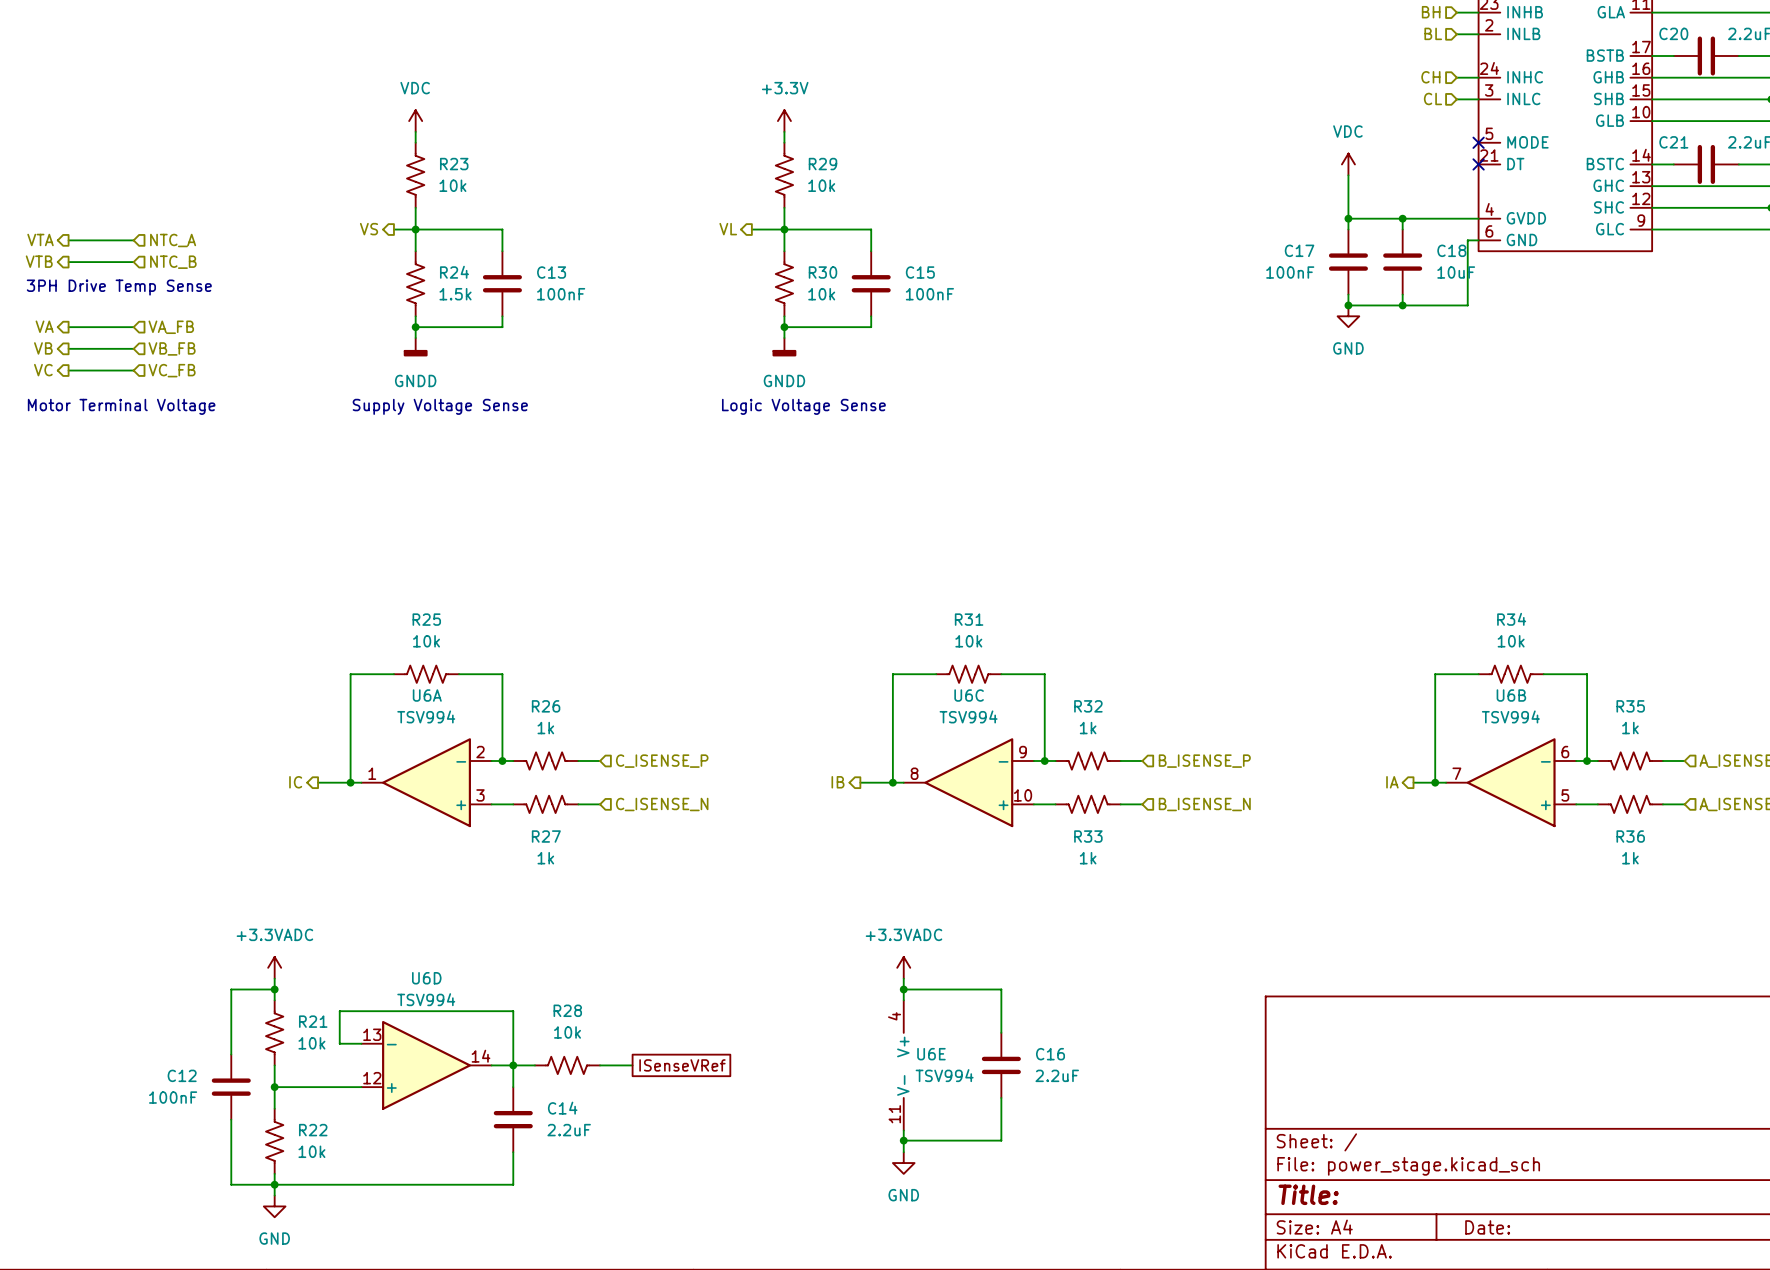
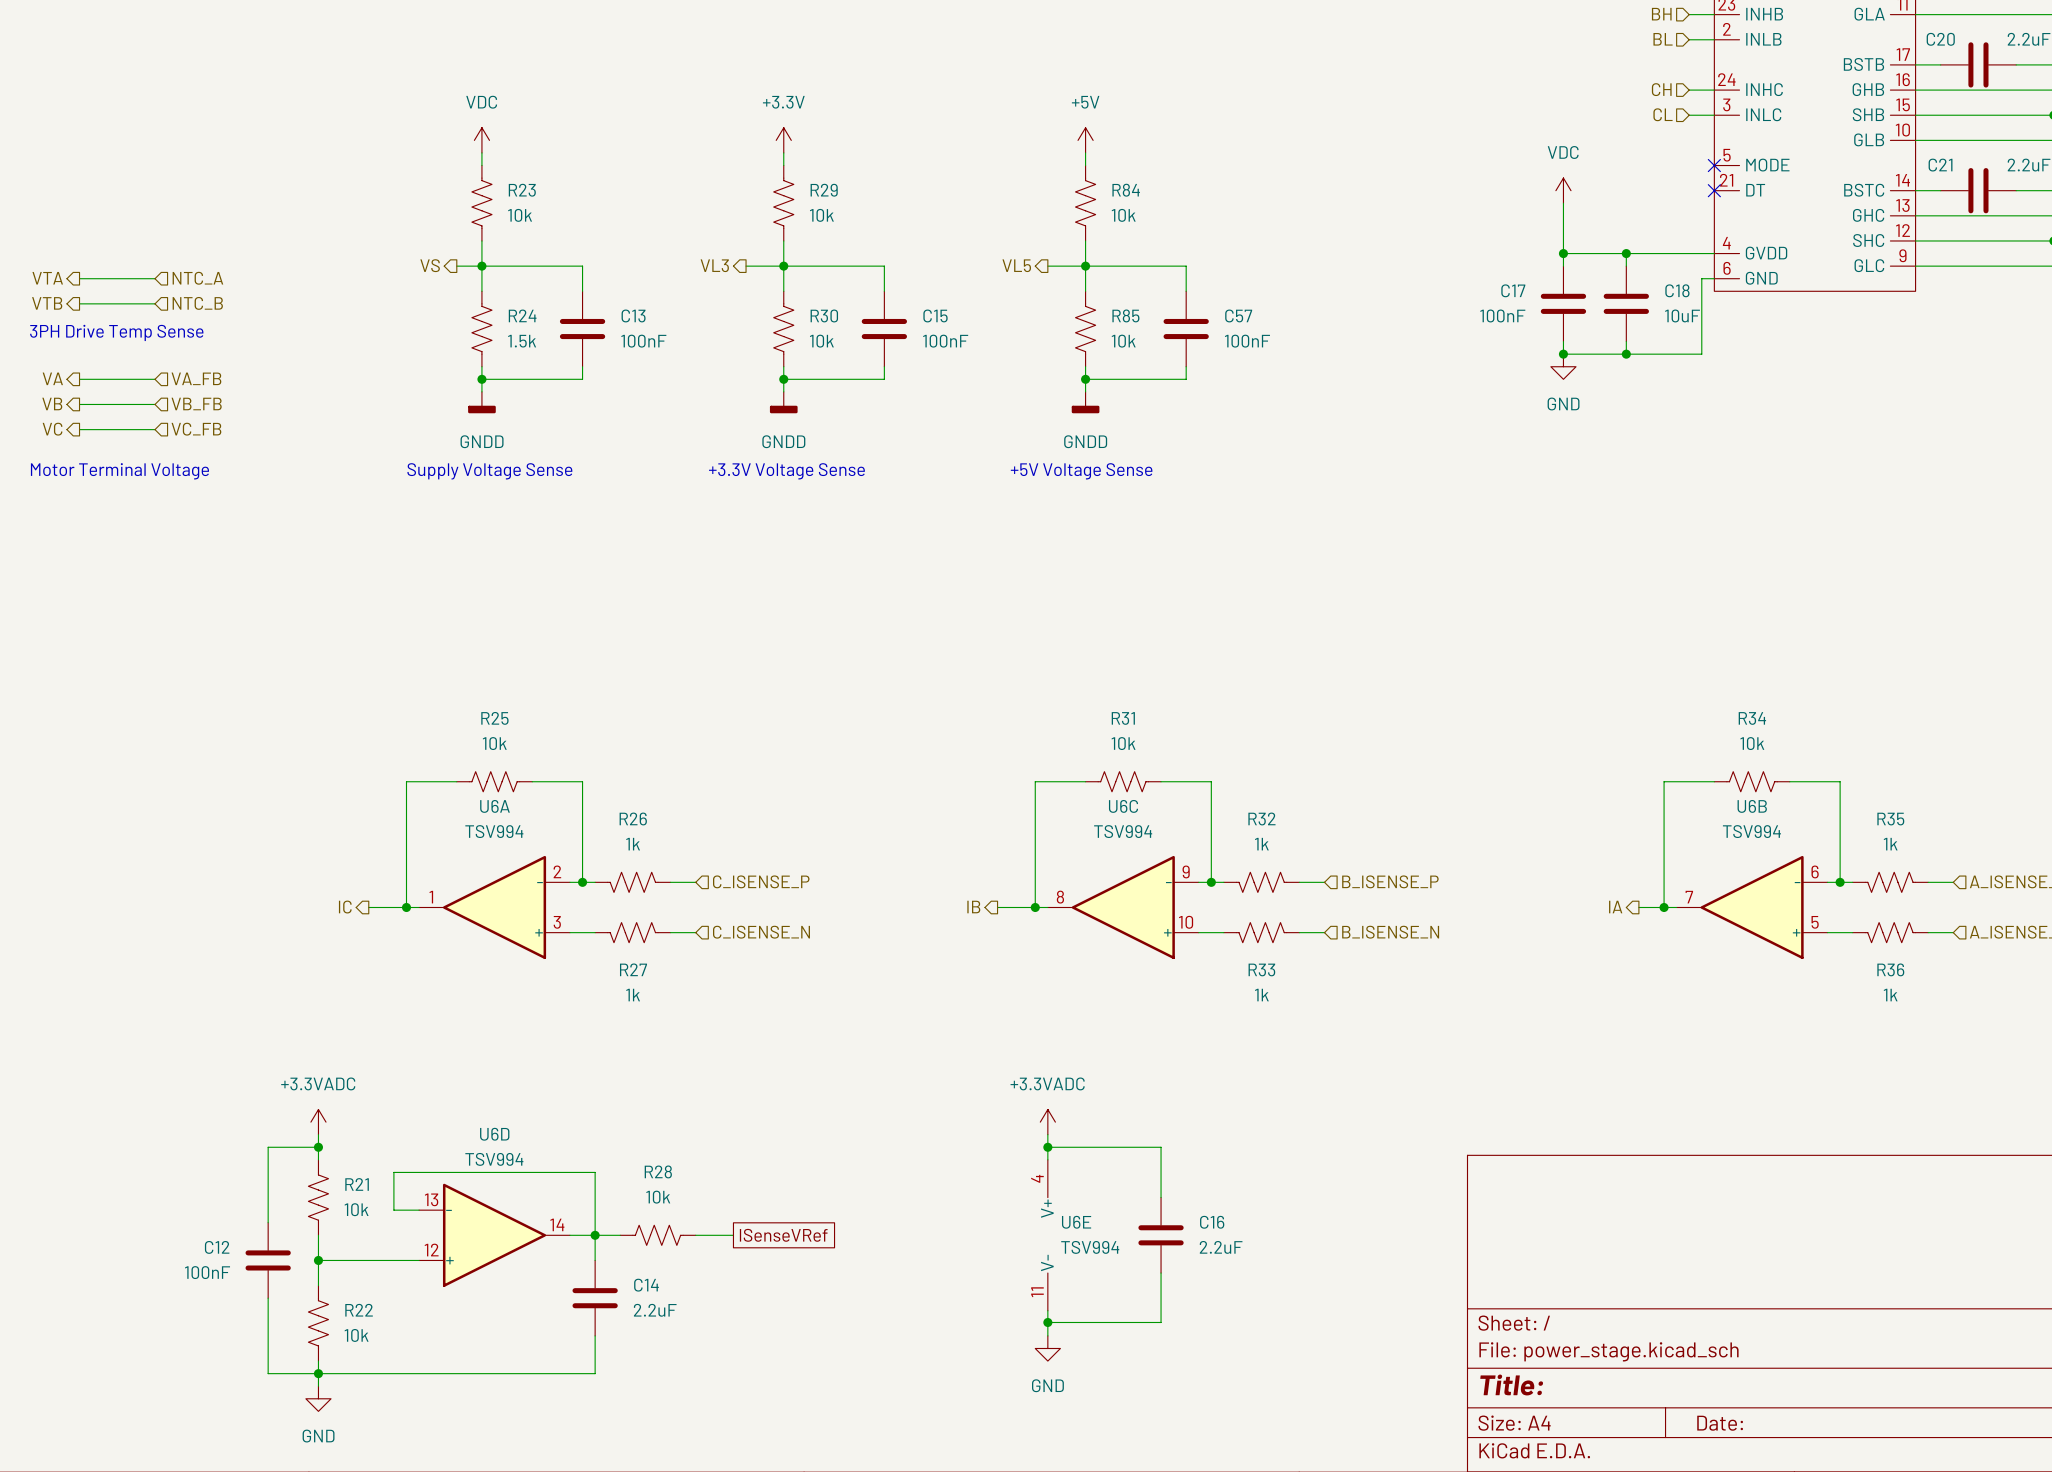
power symbol position: +3.3V (784, 121) -> +3.3V (783, 140)
power symbol: none -> +5V (1085, 140)
wire: (784, 131) (784, 142) -> (783, 152) (783, 165)
wire: none -> (1085, 152) (1085, 165)
R29 position: (784, 175) -> (783, 203)
R84: none -> 10k (1085, 203)
wire: (784, 207) (784, 251) -> (783, 240) (783, 291)
wire: none -> (1085, 240) (1085, 291)
hierarchical label: none -> VL3 (714, 265)
wire: none -> (746, 266) (871, 266)
junction: none -> (783, 266)
hierarchical label: VL (728, 229) -> none
wire: (762, 229) (871, 229) (871, 251) -> (884, 266) (884, 291)
junction: (784, 229) -> none
hierarchical label: none -> VL5 (1016, 265)
wire: none -> (1047, 266) (1186, 266) (1186, 291)
junction: none -> (1085, 266)
R30 position: (784, 283) -> (783, 329)
C15 position: (871, 283) -> (884, 329)
R85: none -> 10k (1085, 329)
C57: none -> 100nF (1186, 329)
wire: (784, 316) (784, 337) -> (783, 366) (783, 391)
wire: (871, 316) (871, 327) (784, 327) -> (884, 366) (884, 379) (783, 379)
wire: none -> (1085, 366) (1085, 391)
wire: none -> (1186, 366) (1186, 379) (1085, 379)
junction: none -> (783, 379)
junction: (784, 327) -> none
junction: none -> (1085, 379)
power symbol: none -> GNDD (783, 402)
power symbol: GNDD (784, 347) -> none
power symbol: none -> GNDD (1085, 402)
text: none -> +3.3V Voltage Sense (786, 471)
text: Logic Voltage Sense (803, 406) -> none
text: none -> +5V Voltage Sense (1081, 471)

